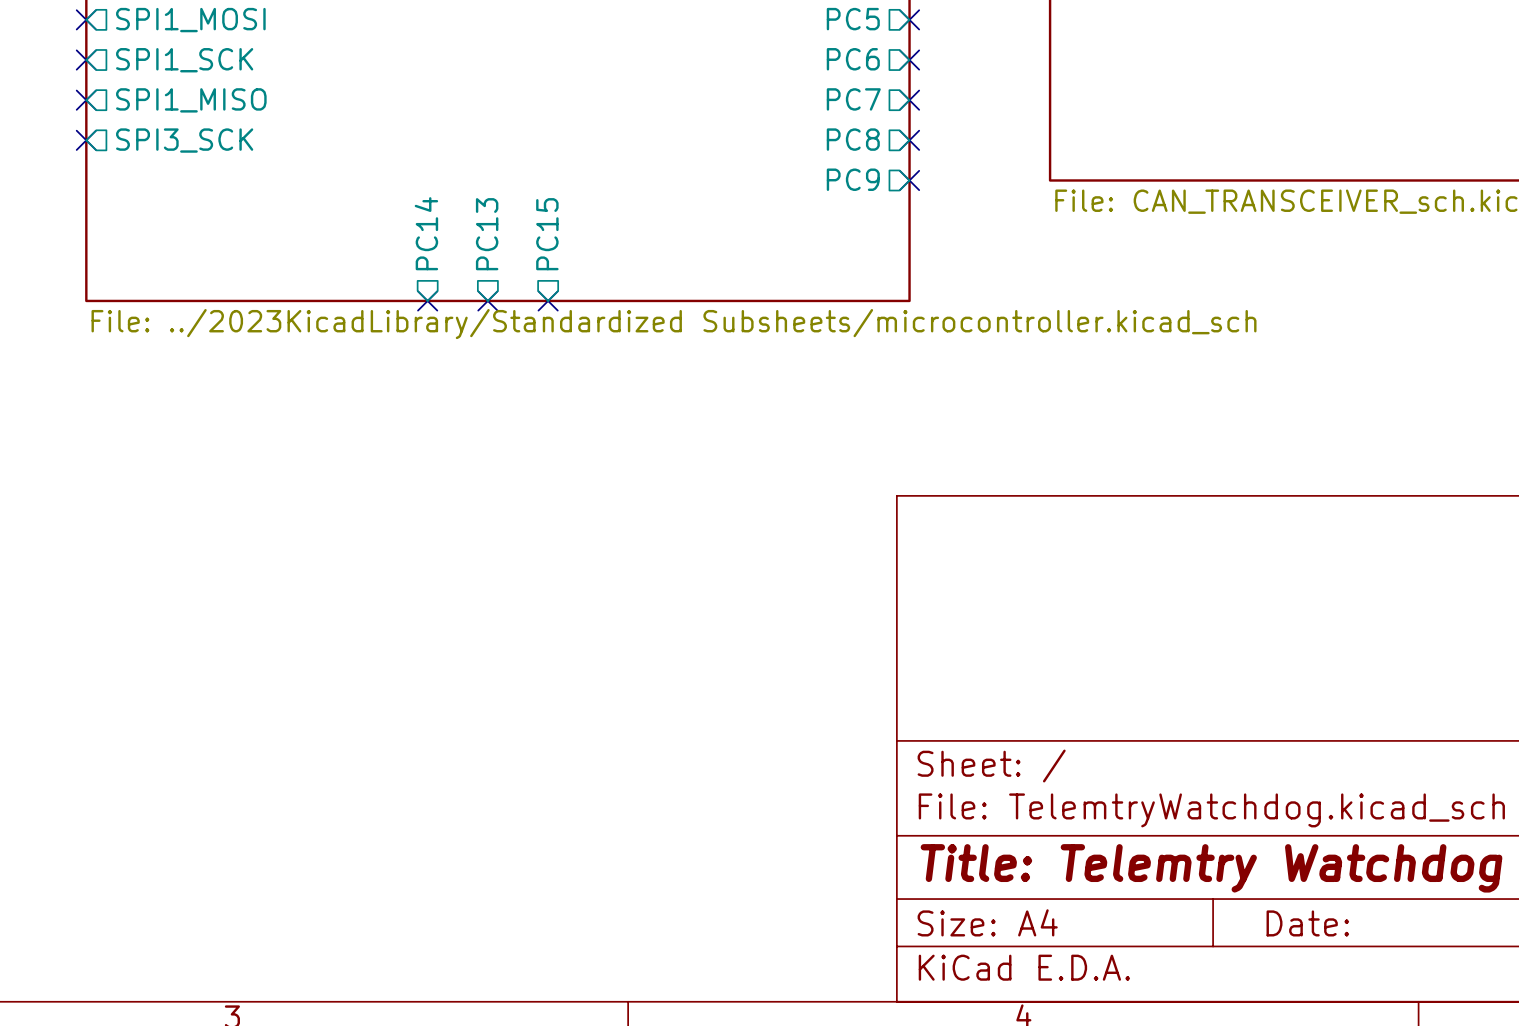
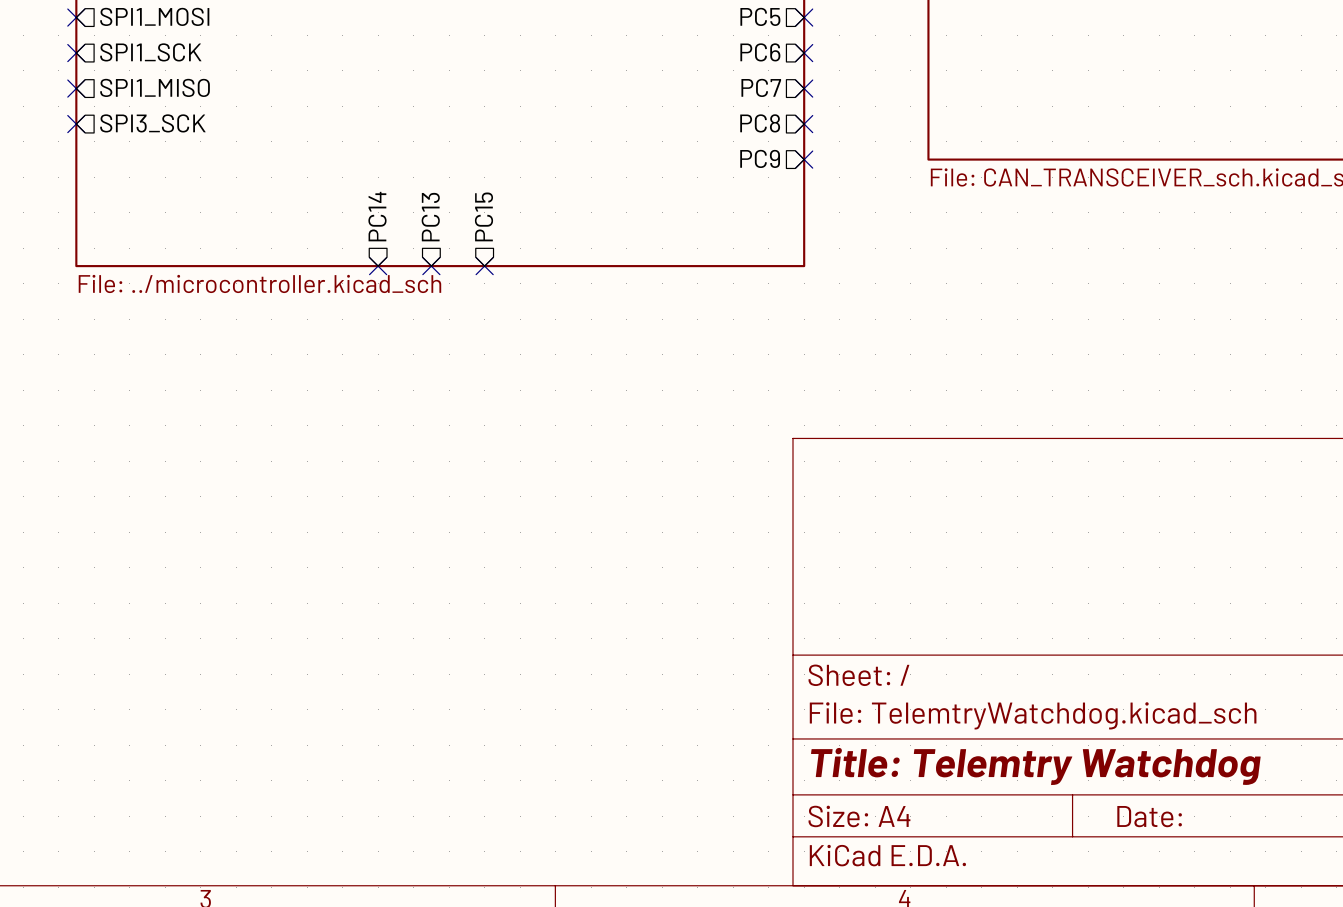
sheet value: File: ../2023KicadLibrary/Standardized Subsheets/microcontroller.kicad_sch (674, 324) -> File: ../microcontroller.kicad_sch (259, 283)

